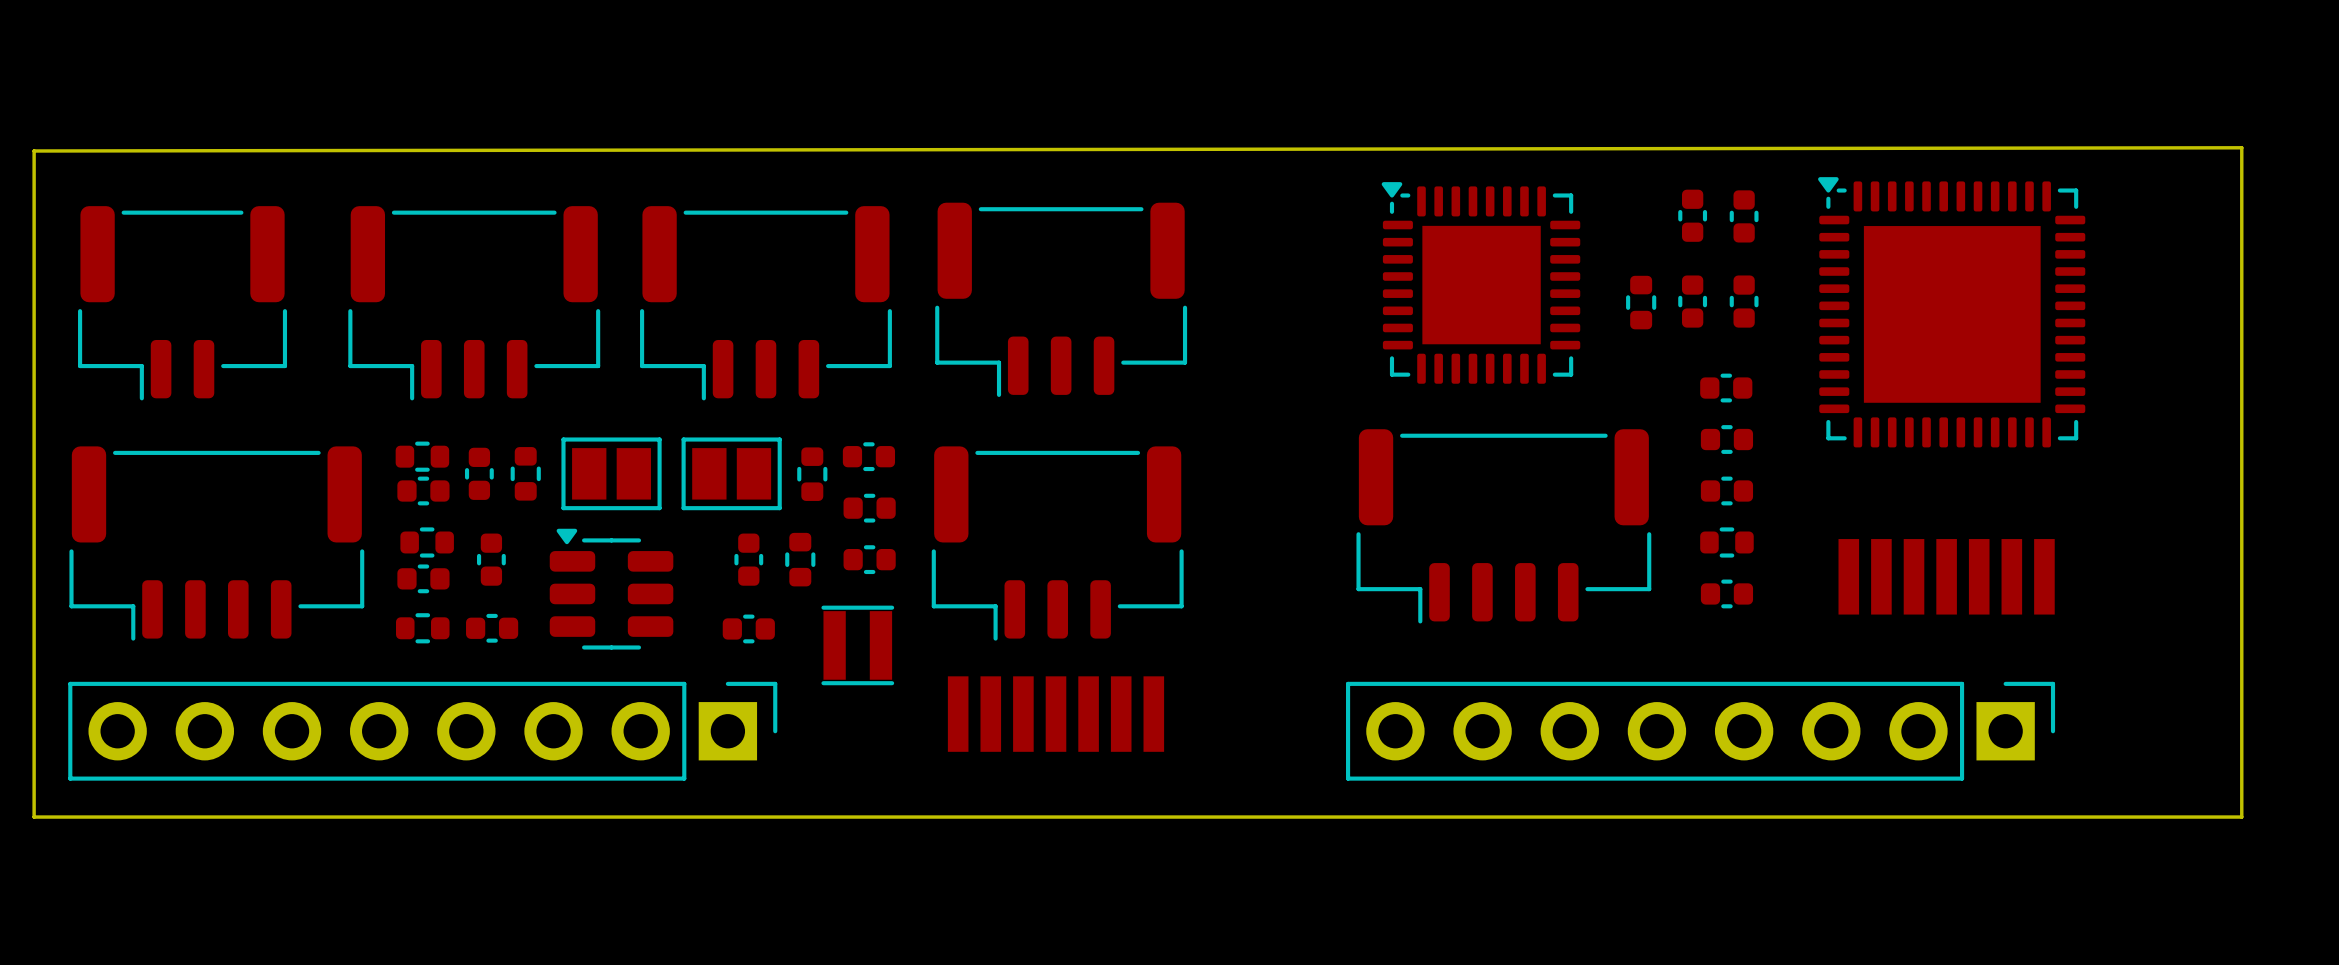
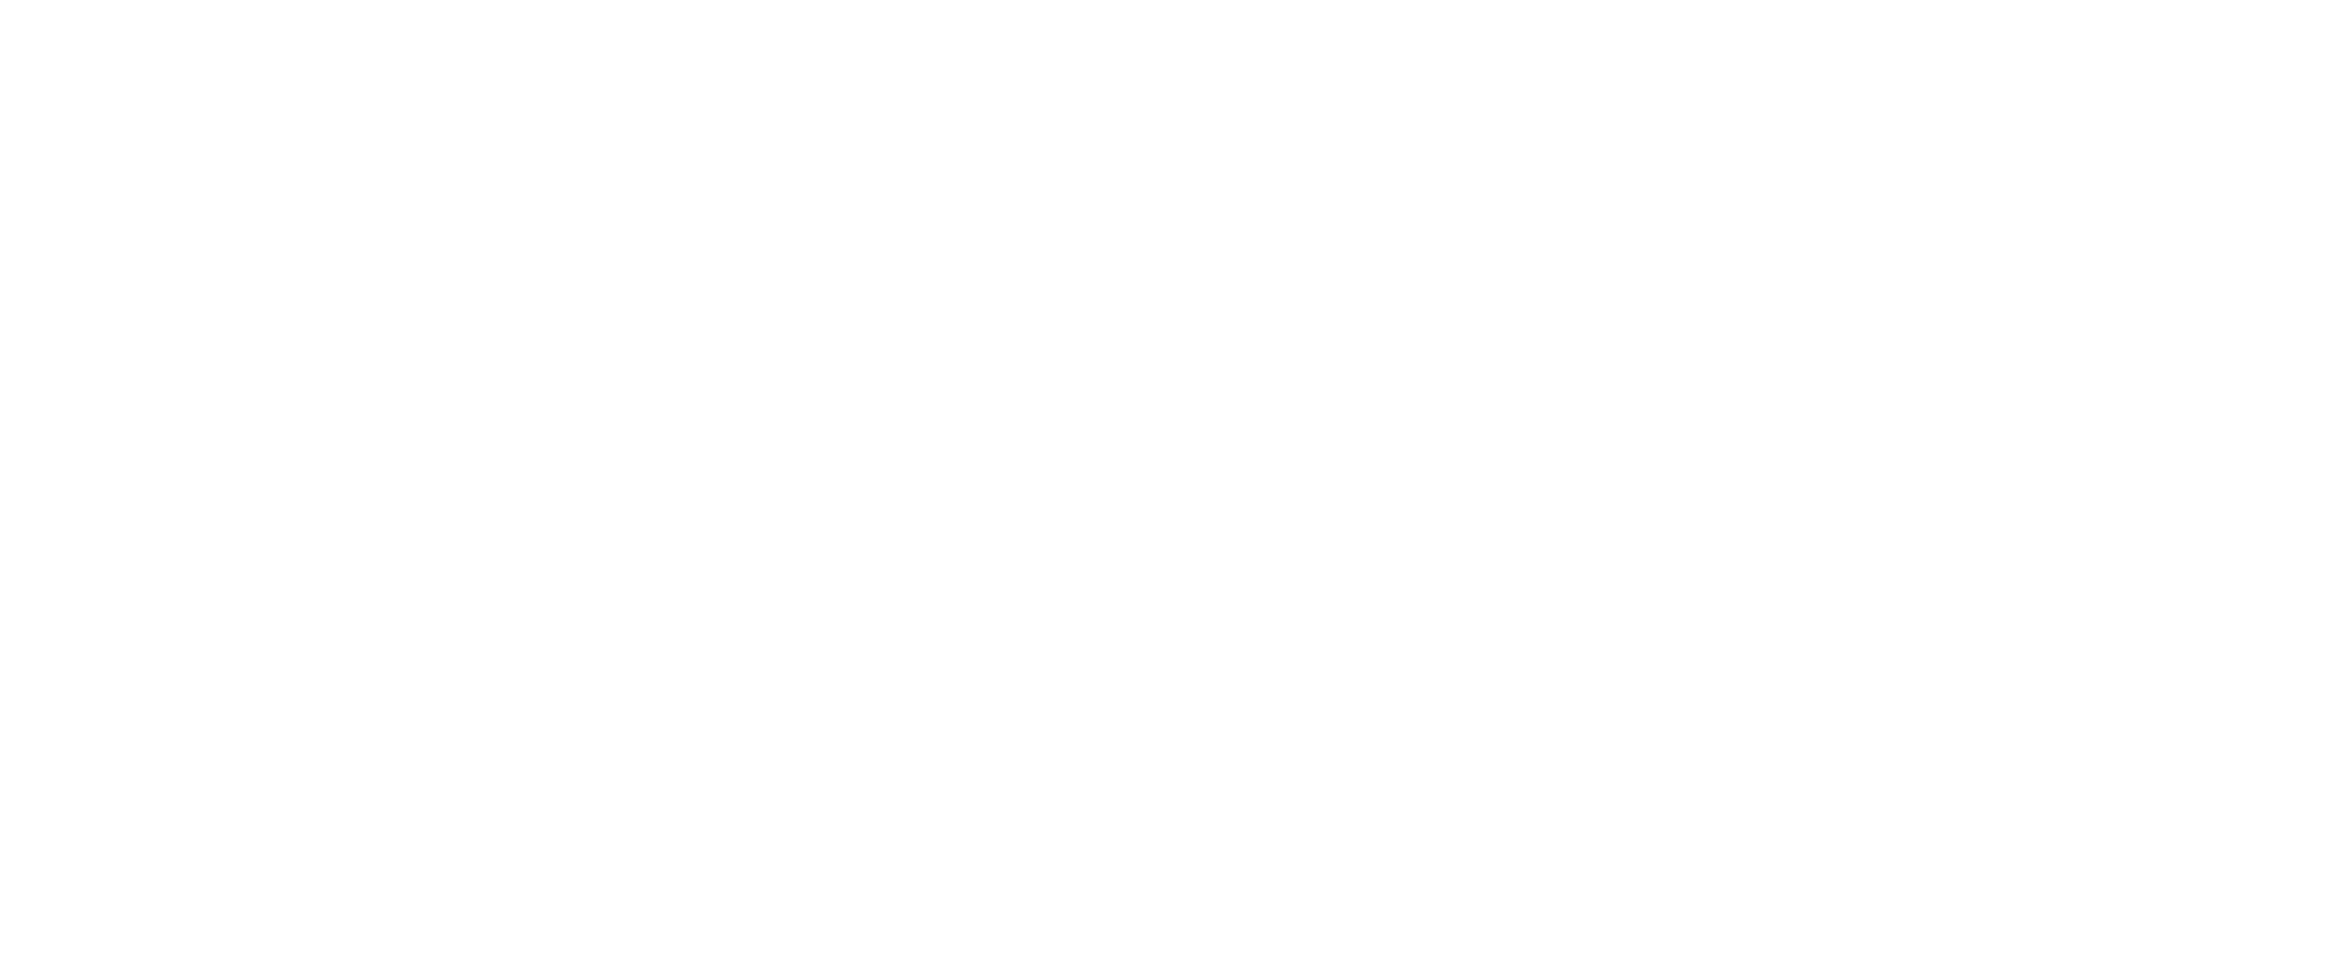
board edge: (2241, 147) (34, 151) (34, 817) (2241, 817) (2241, 147) -> none
part: (1692, 215) -> none
part: (1744, 216) -> none
part: (1480, 282) -> none
part: (1061, 299) -> none
part: (1692, 301) -> none
part: (1744, 301) -> none
part: (1641, 302) -> none
part: (182, 303) -> none
part: (474, 303) -> none
part: (765, 303) -> none
part: (1951, 312) -> none
part: (1726, 388) -> none
part: (1726, 439) -> none
part: (422, 456) -> none
part: (868, 456) -> none
part: (479, 473) -> none
part: (525, 473) -> none
part: (611, 473) -> none
part: (731, 473) -> none
part: (812, 474) -> none
part: (423, 490) -> none
part: (1726, 490) -> none
part: (869, 508) -> none
part: (1503, 526) -> none
part: (427, 542) -> none
part: (1726, 542) -> none
part: (216, 543) -> none
part: (1057, 543) -> none
part: (491, 559) -> none
part: (748, 559) -> none
part: (800, 559) -> none
part: (869, 559) -> none
part: (1946, 576) -> none
part: (423, 578) -> none
part: (611, 589) -> none
part: (1726, 593) -> none
part: (422, 628) -> none
part: (492, 628) -> none
part: (748, 628) -> none
part: (857, 645) -> none
part: (1055, 714) -> none
part: (422, 731) -> none
part: (1700, 731) -> none

